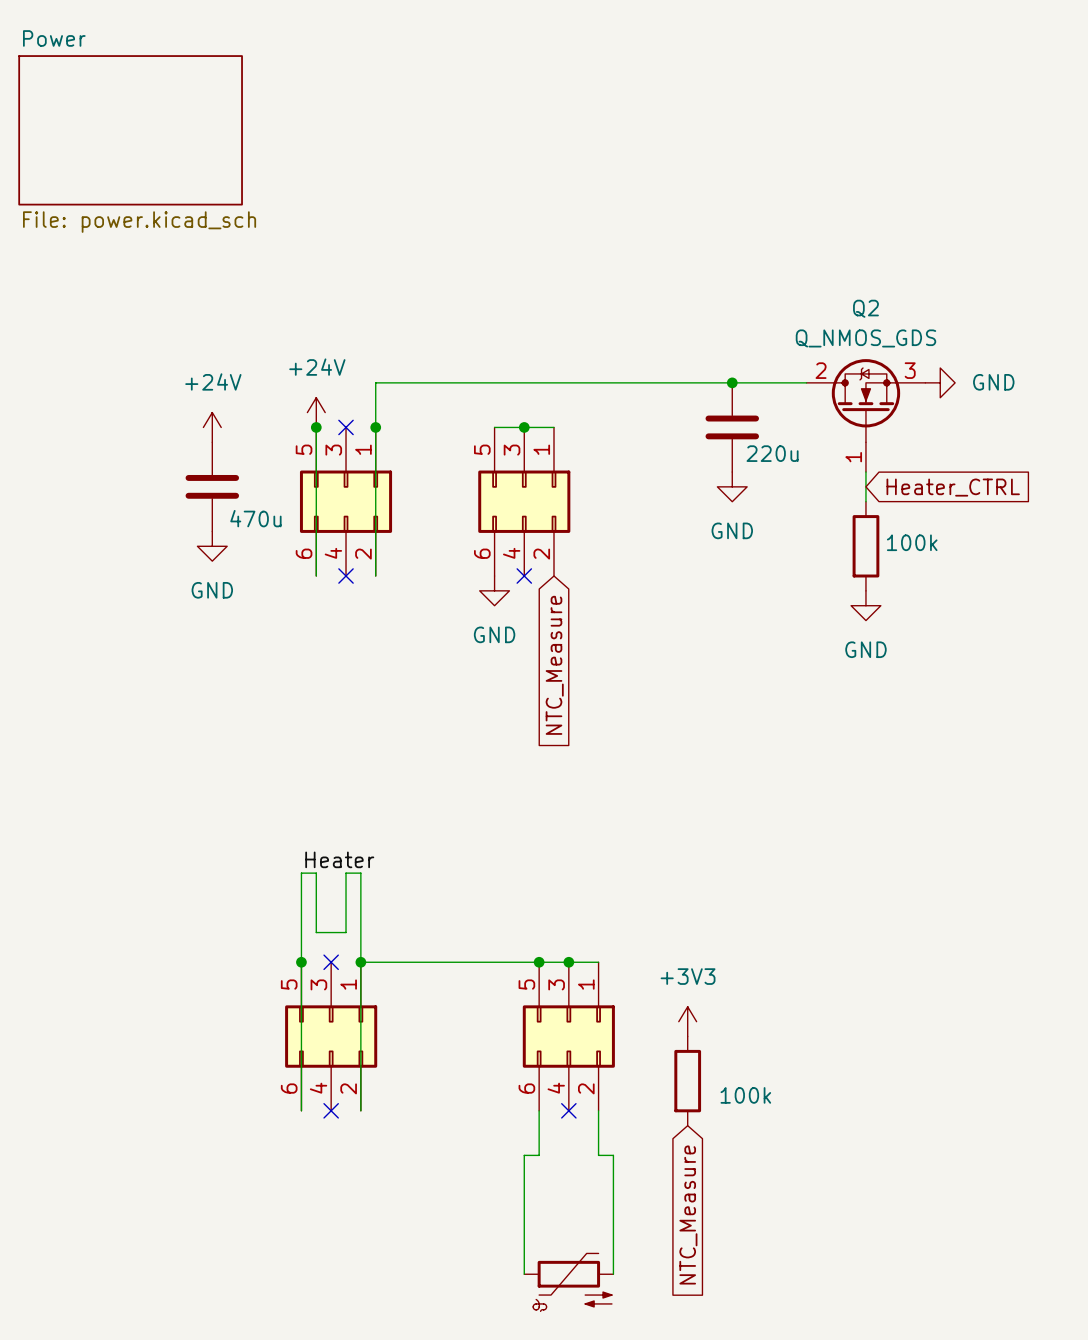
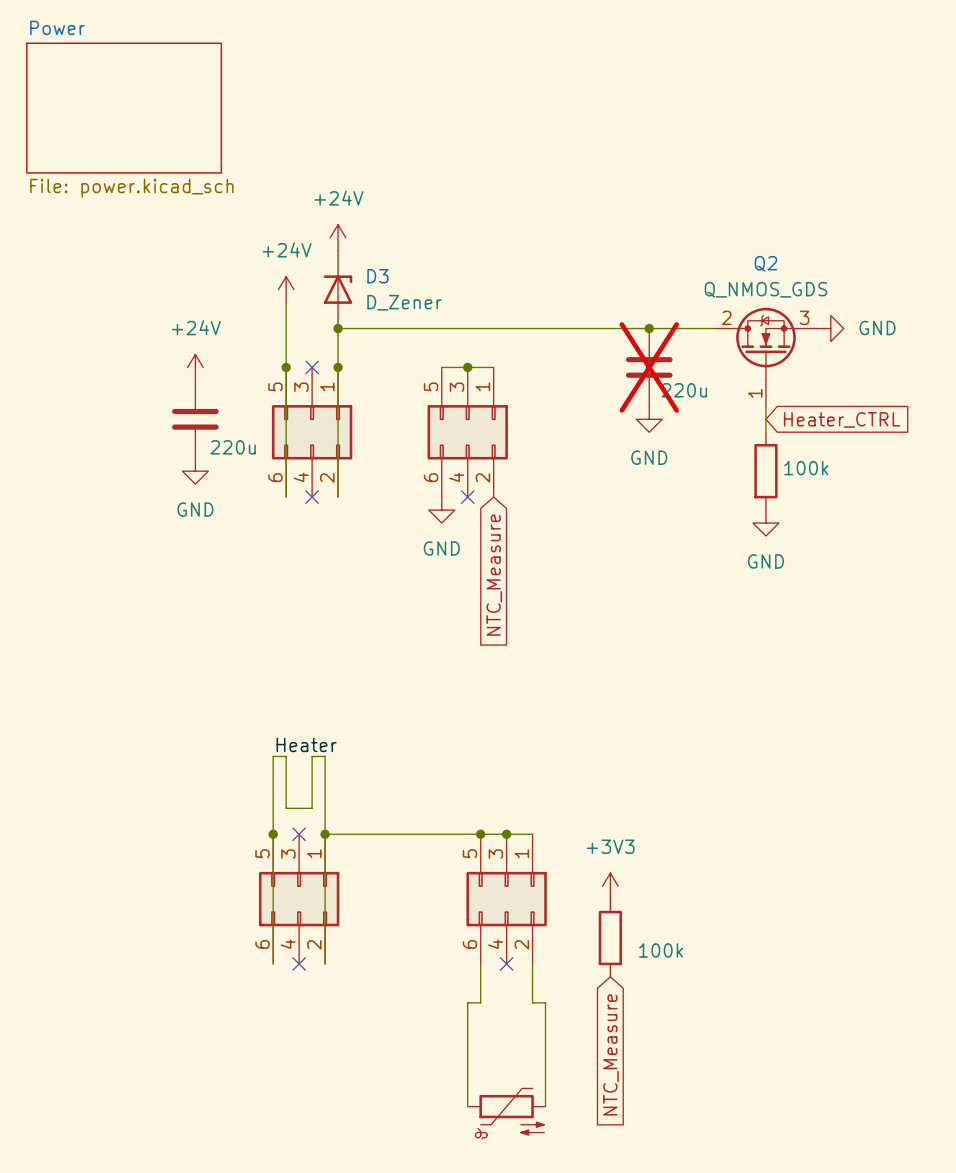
power symbol: none -> +24V (338, 237)
power symbol: none -> +24V (286, 289)
D3: none -> D_Zener (338, 289)
wire: none -> (286, 302) (286, 367)
junction: none -> (338, 328)
power symbol: +24V (316, 412) -> none
part do-not-place cross: none -> (649, 367)
part value: 470u (255, 518) -> 220u (233, 447)

